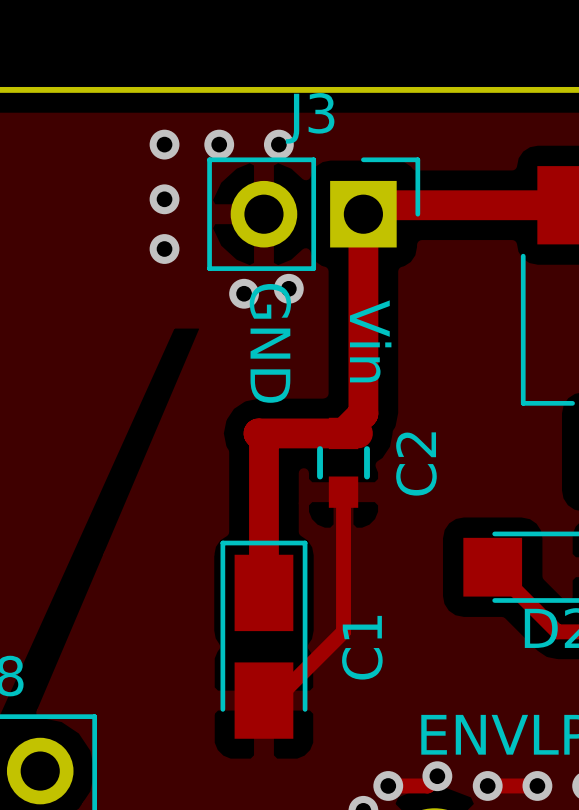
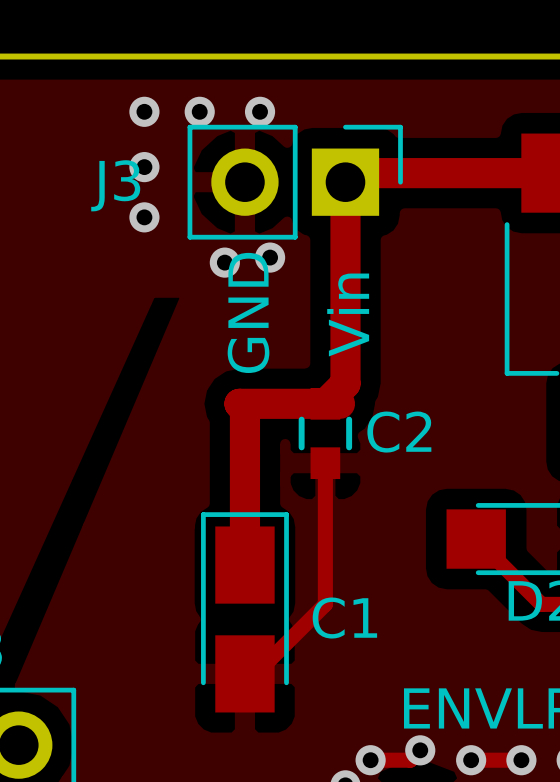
J3 name position: J3 (310, 118) -> J3 (115, 185)
text rotation: 0° (370, 341) -> 180° (348, 314)
text rotation: 0° (270, 343) -> 180° (248, 312)
C2 name rotation: 0° (416, 463) -> 90° clockwise (399, 432)
C1 name rotation: 0° (362, 647) -> 90° clockwise (344, 618)

